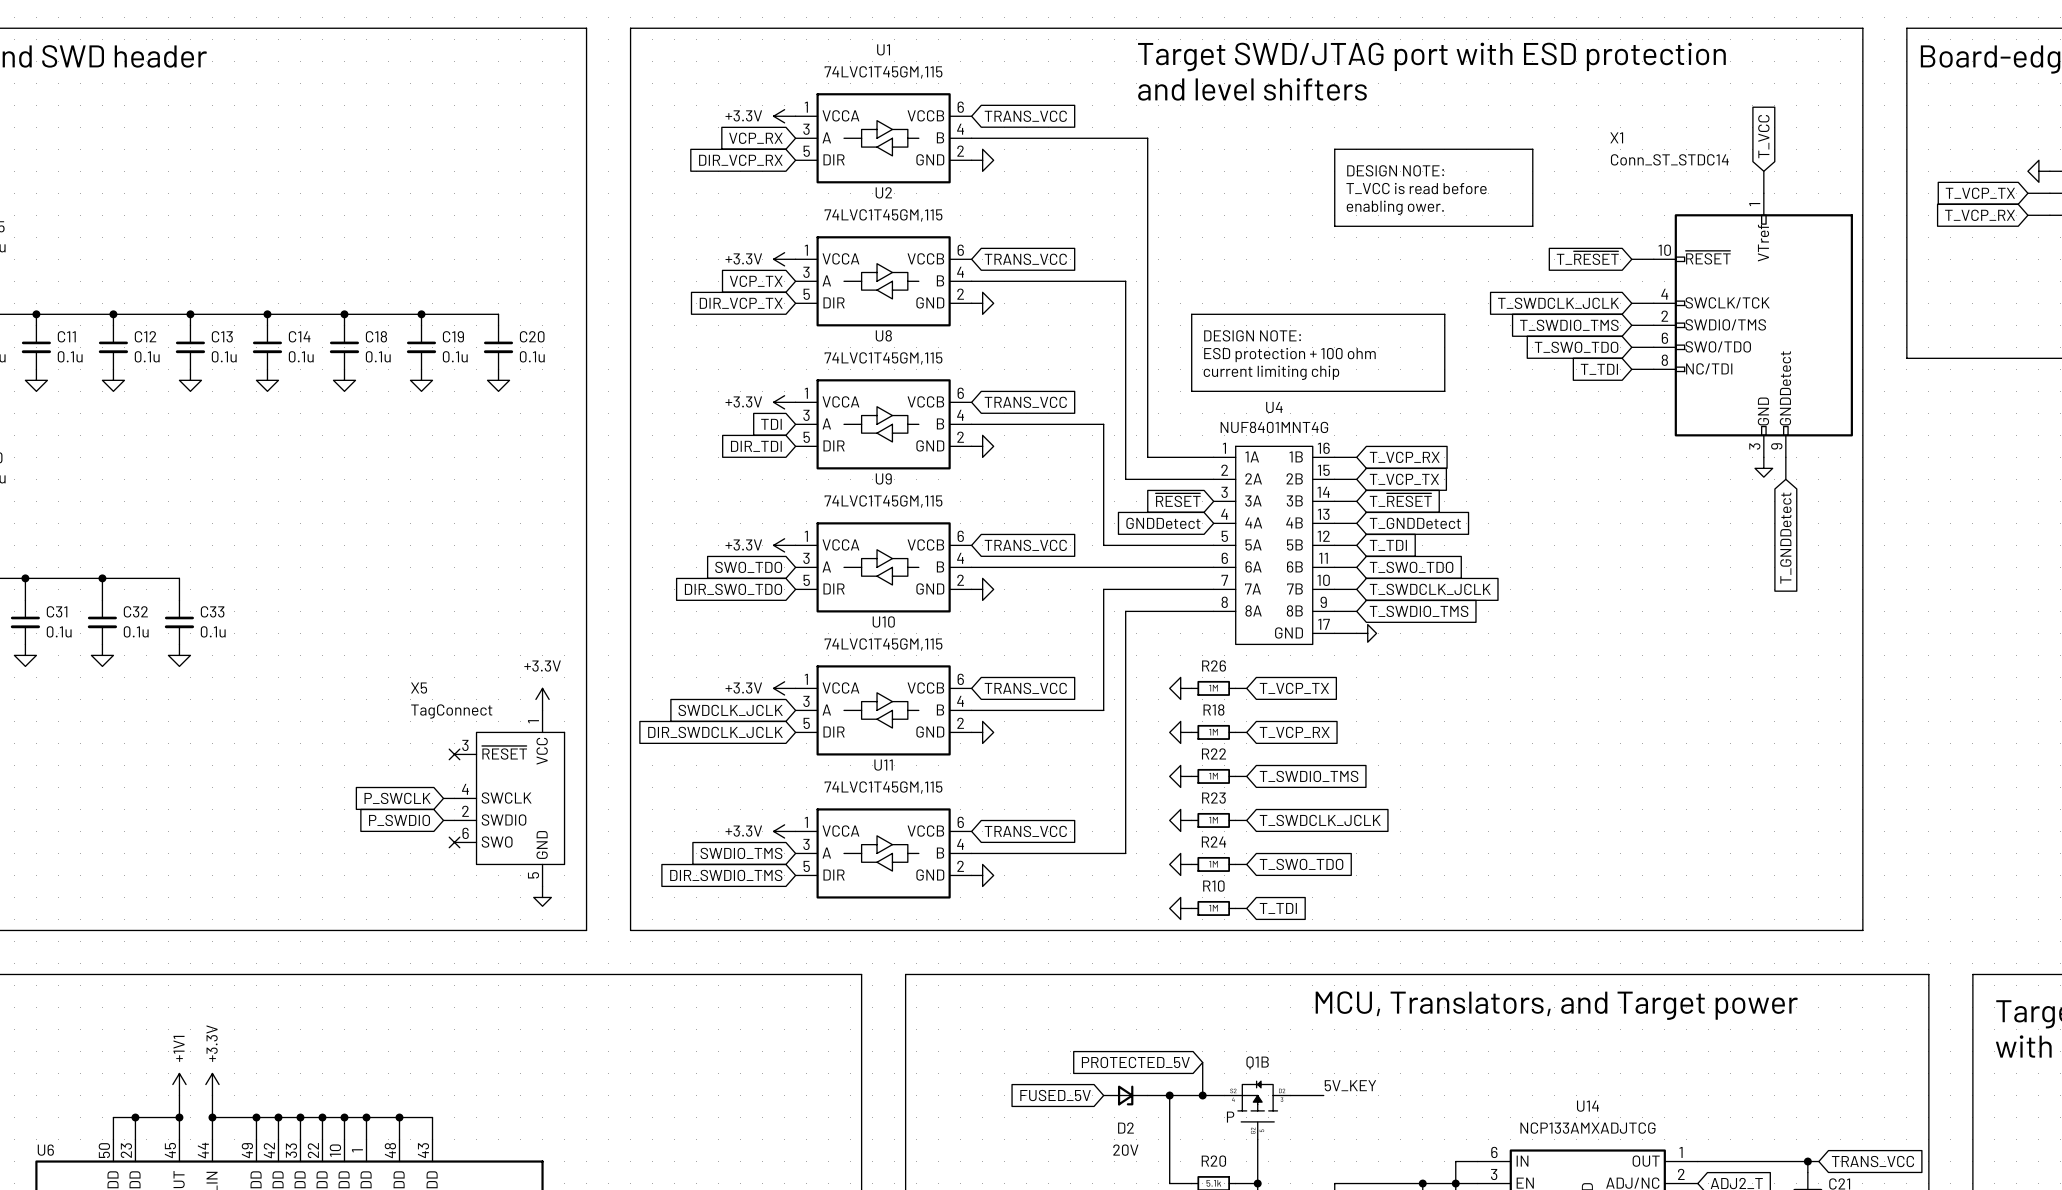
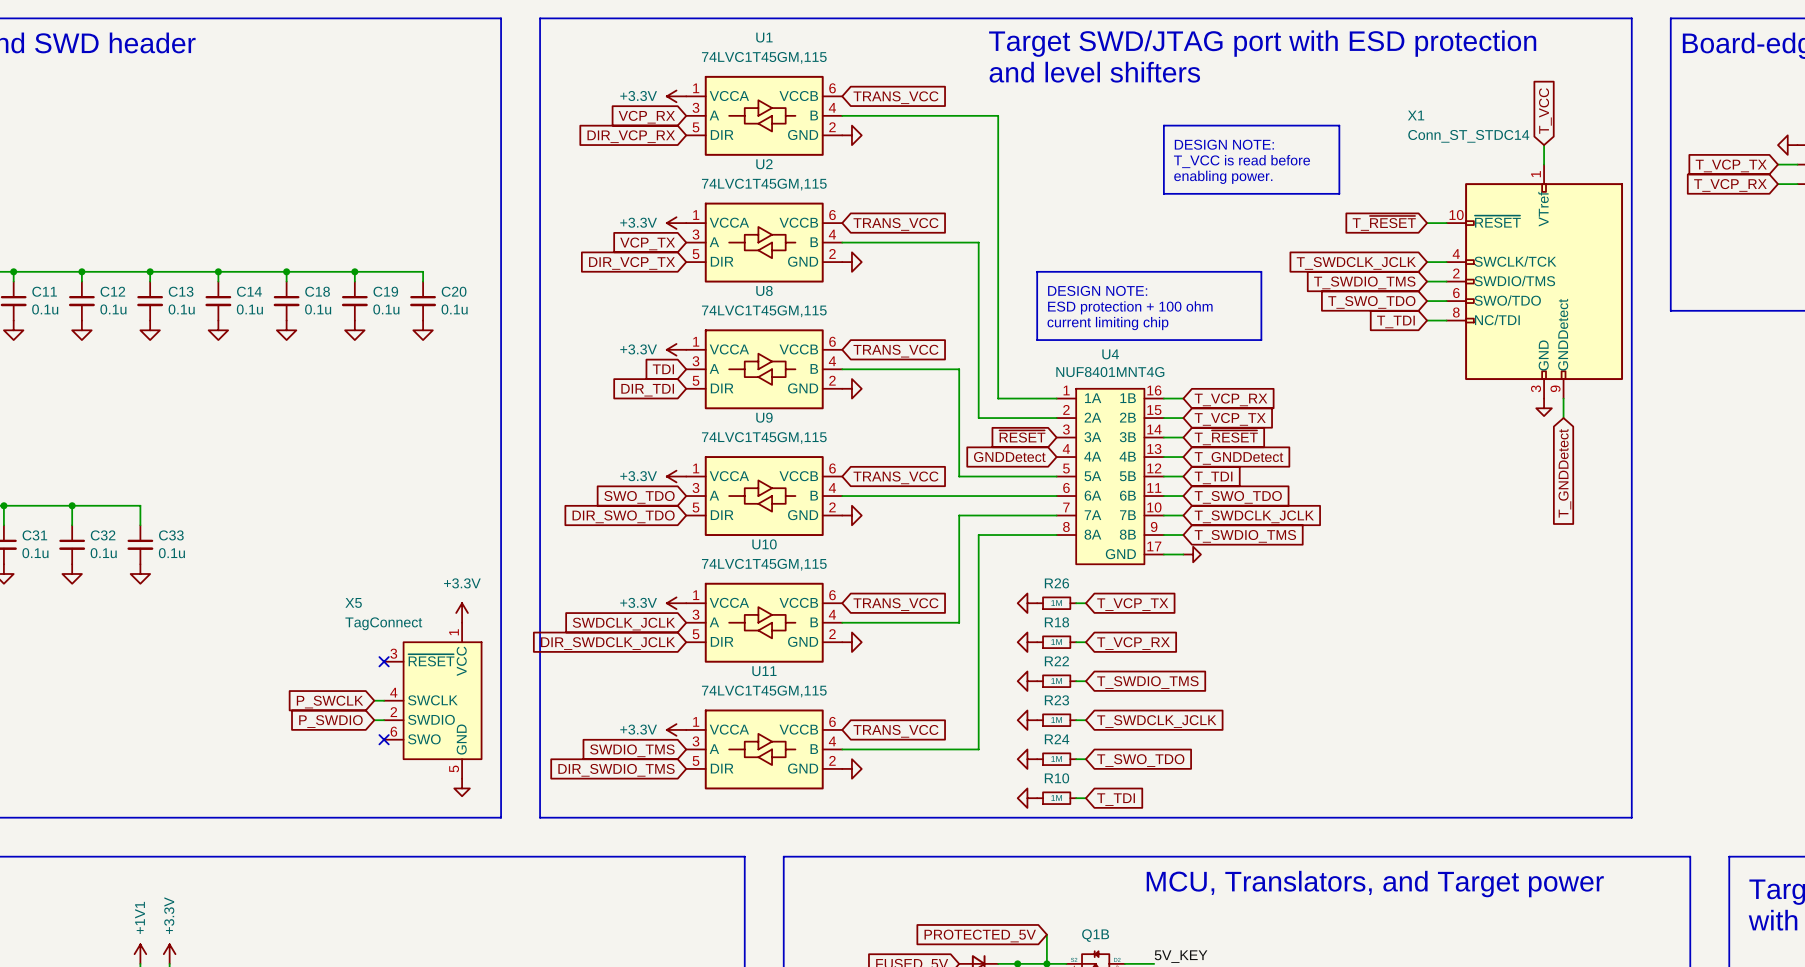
text: enabling ower. (1395, 207) -> enabling power. (1223, 177)

